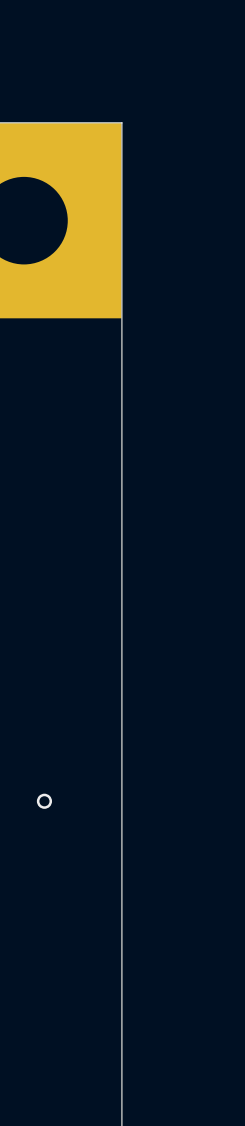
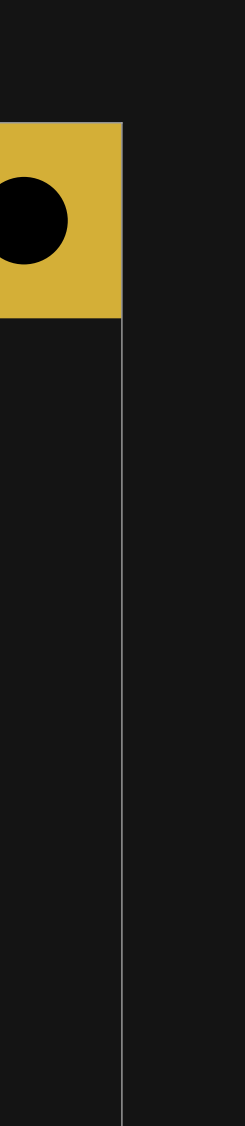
via: (44, 801) -> none

